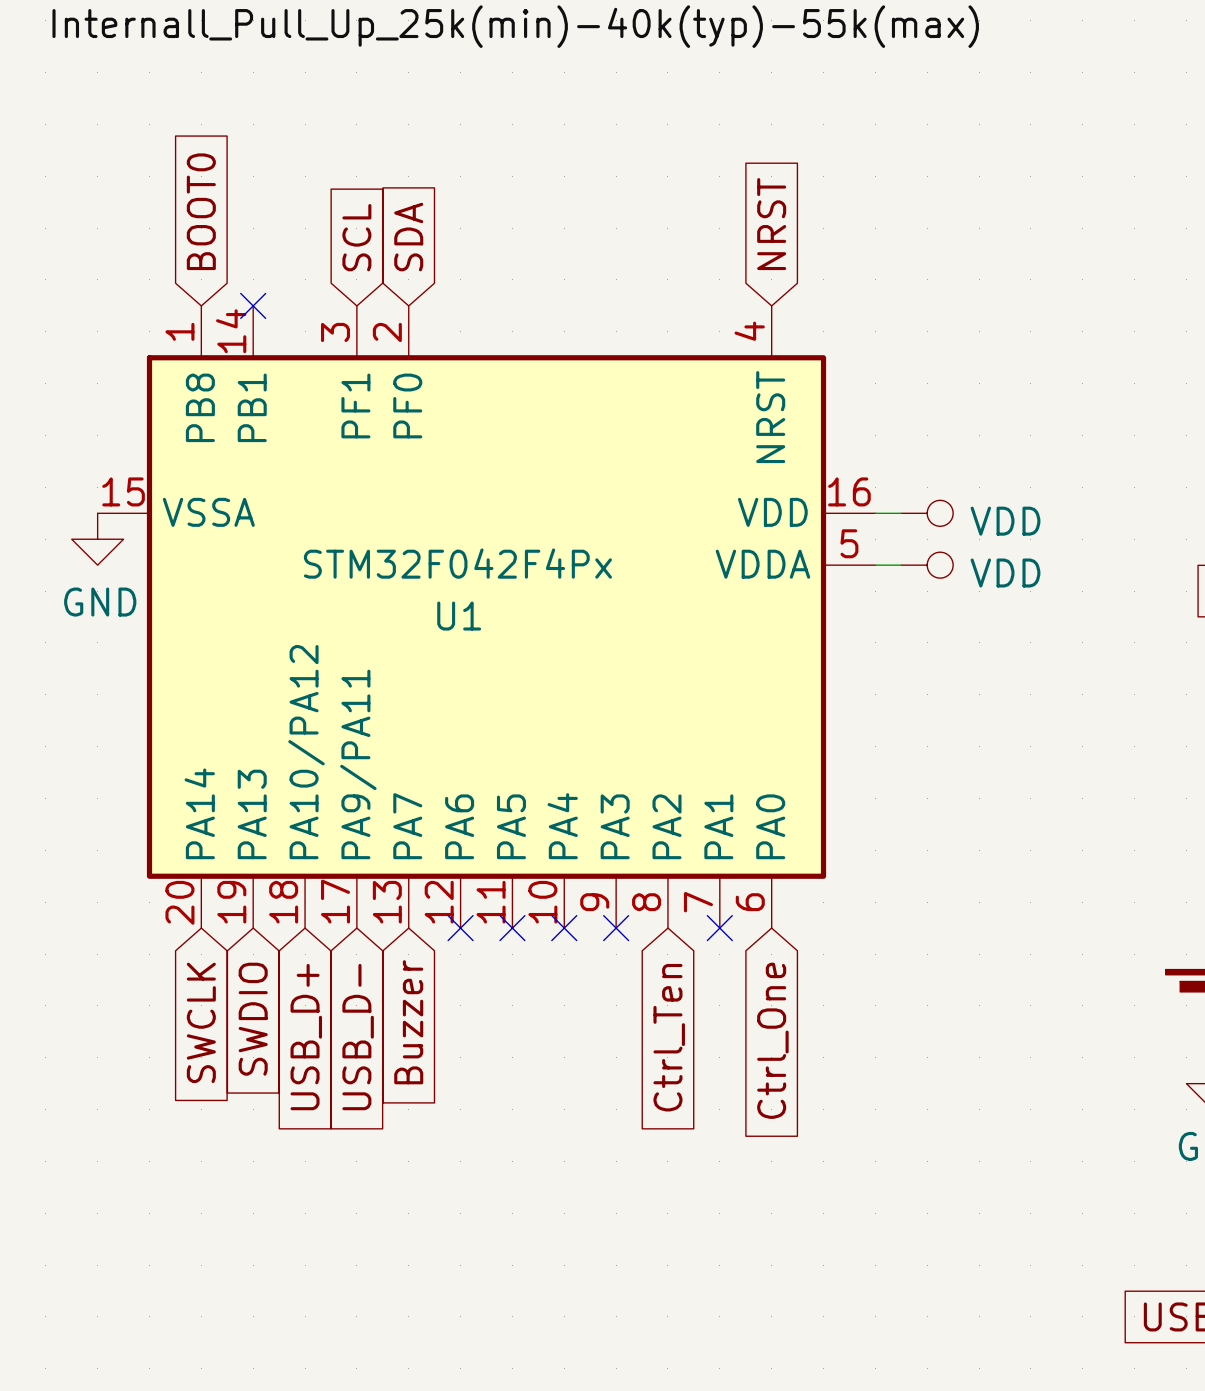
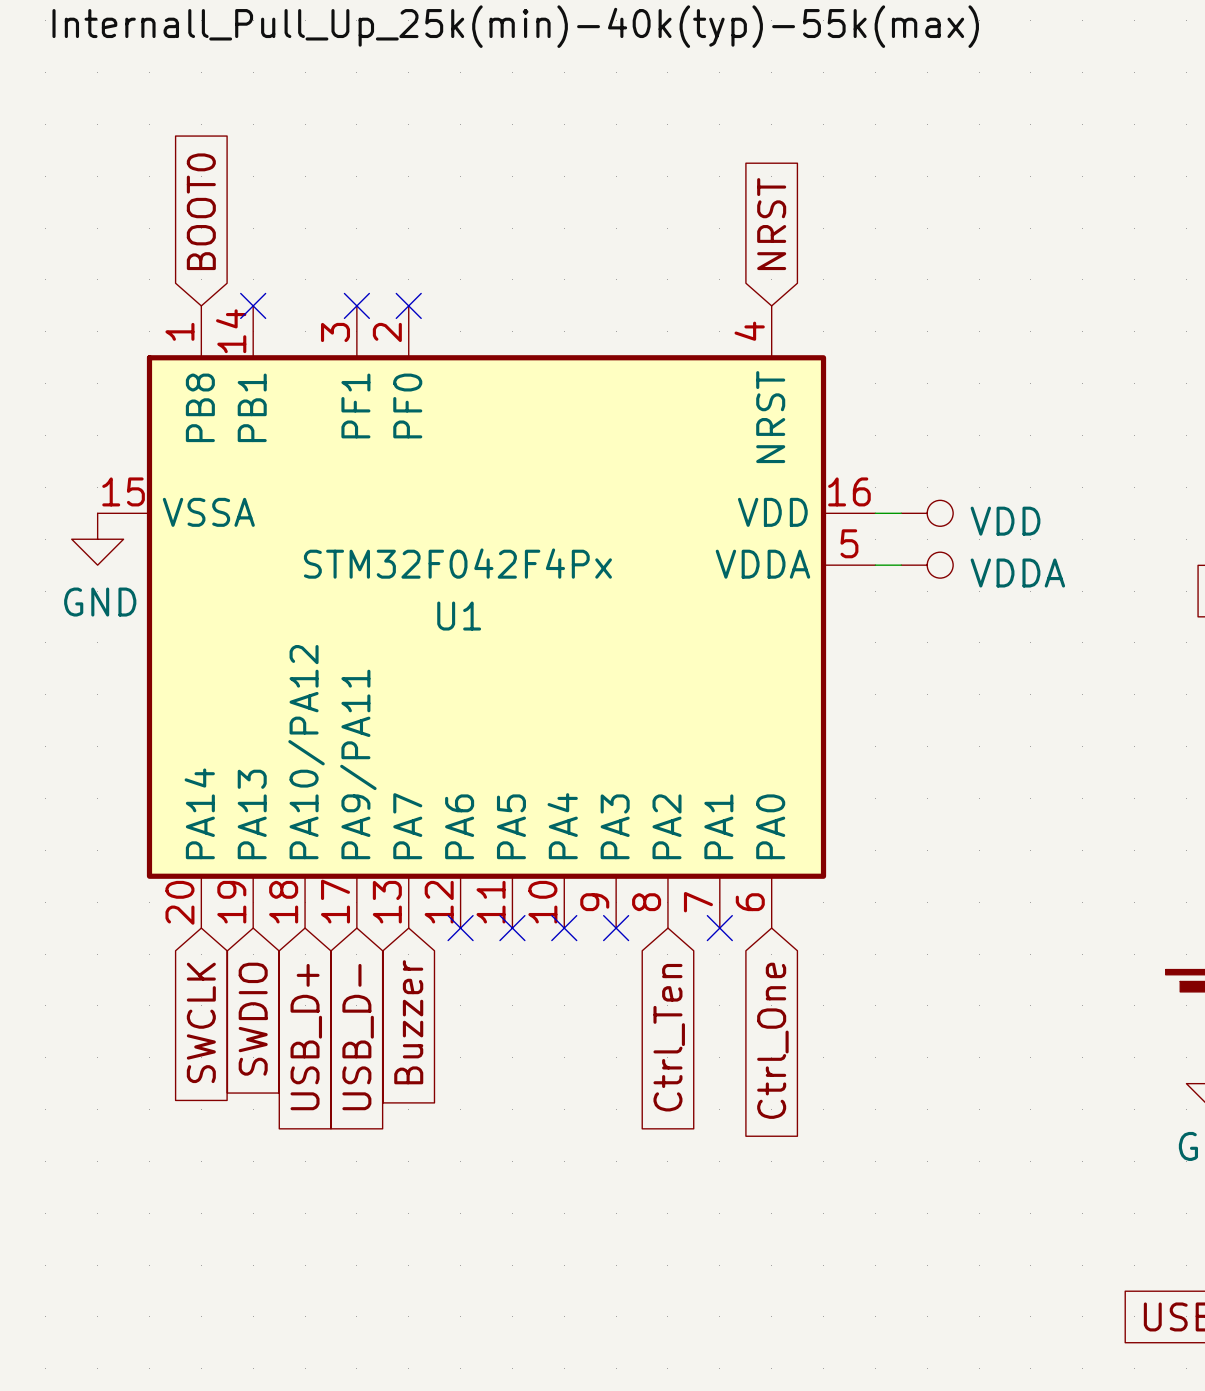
global label: SCL (356, 237) -> none
global label: SDA (408, 237) -> none
no-connect mark: none -> (356, 305)
no-connect mark: none -> (408, 305)
power symbol: VDD (927, 565) -> VDDA (927, 565)

